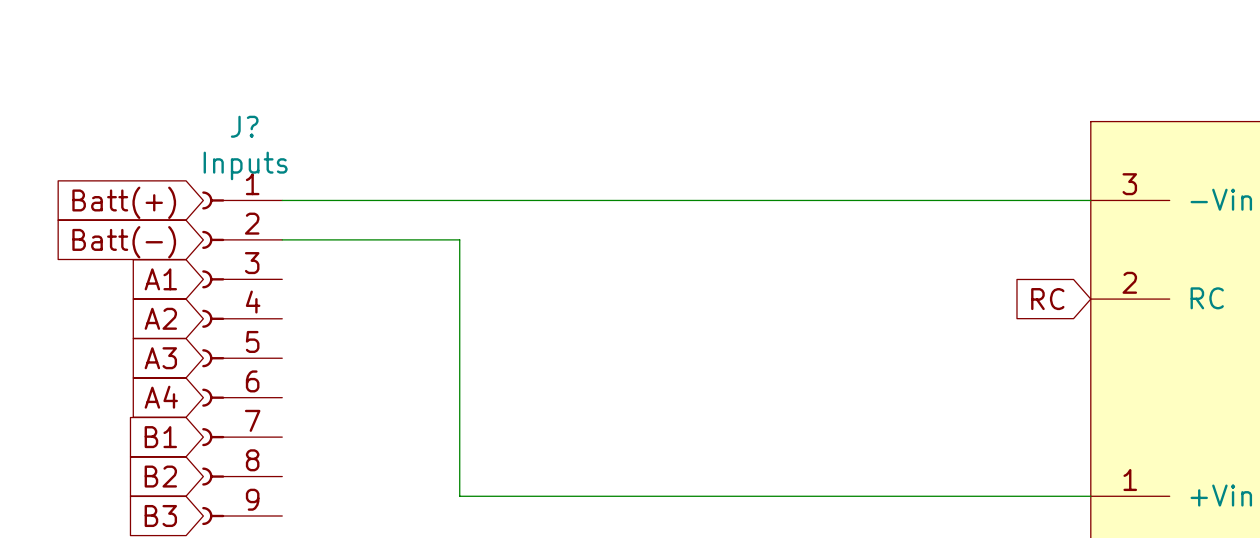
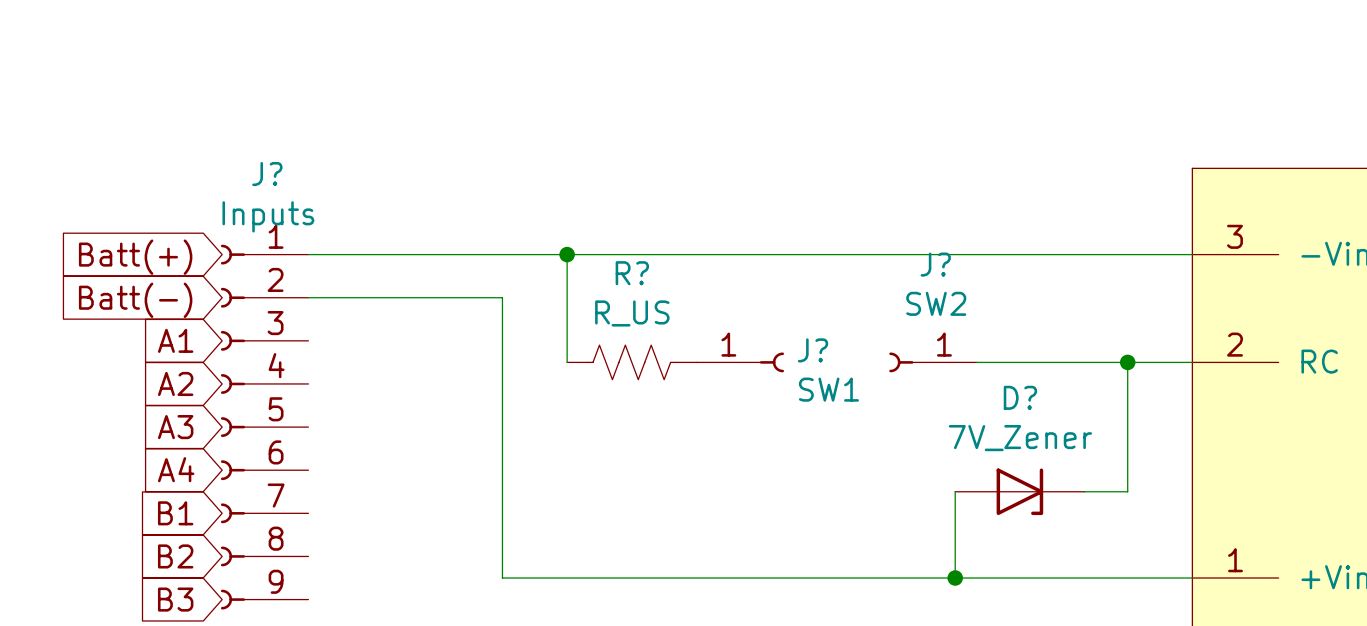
wire: none -> (567, 254) (567, 362)
junction: none -> (567, 254)
R?: none -> R_US (631, 362)
J?: none -> SW1 (740, 362)
J?: none -> SW2 (933, 362)
wire: none -> (976, 362) (1192, 362)
wire: none -> (1127, 362) (1127, 491) (1084, 491)
junction: none -> (1127, 362)
global label: RC (1047, 299) -> none
wire: none -> (955, 491) (955, 578)
D?: none -> 7V_Zener (1019, 491)
junction: none -> (955, 578)

